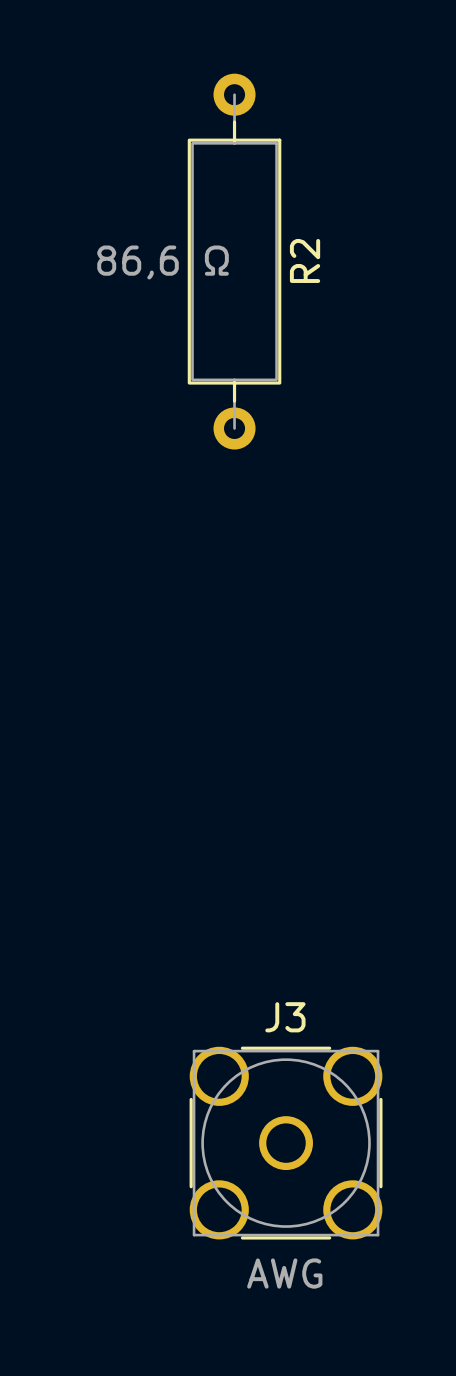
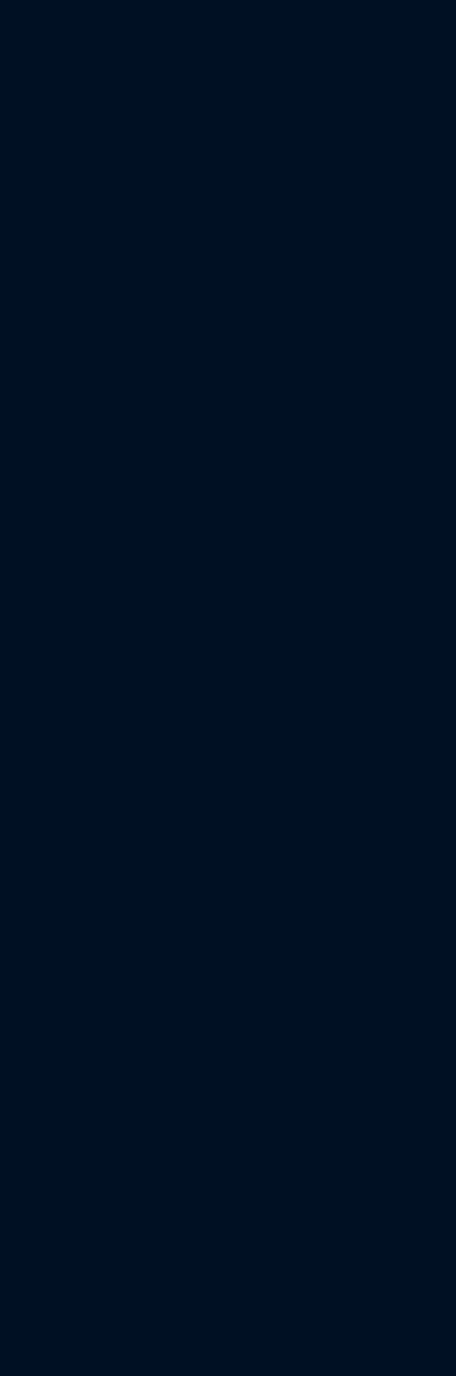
R2: 86,6 Ω (234, 261) -> none
J3: AWG (286, 1143) -> none

